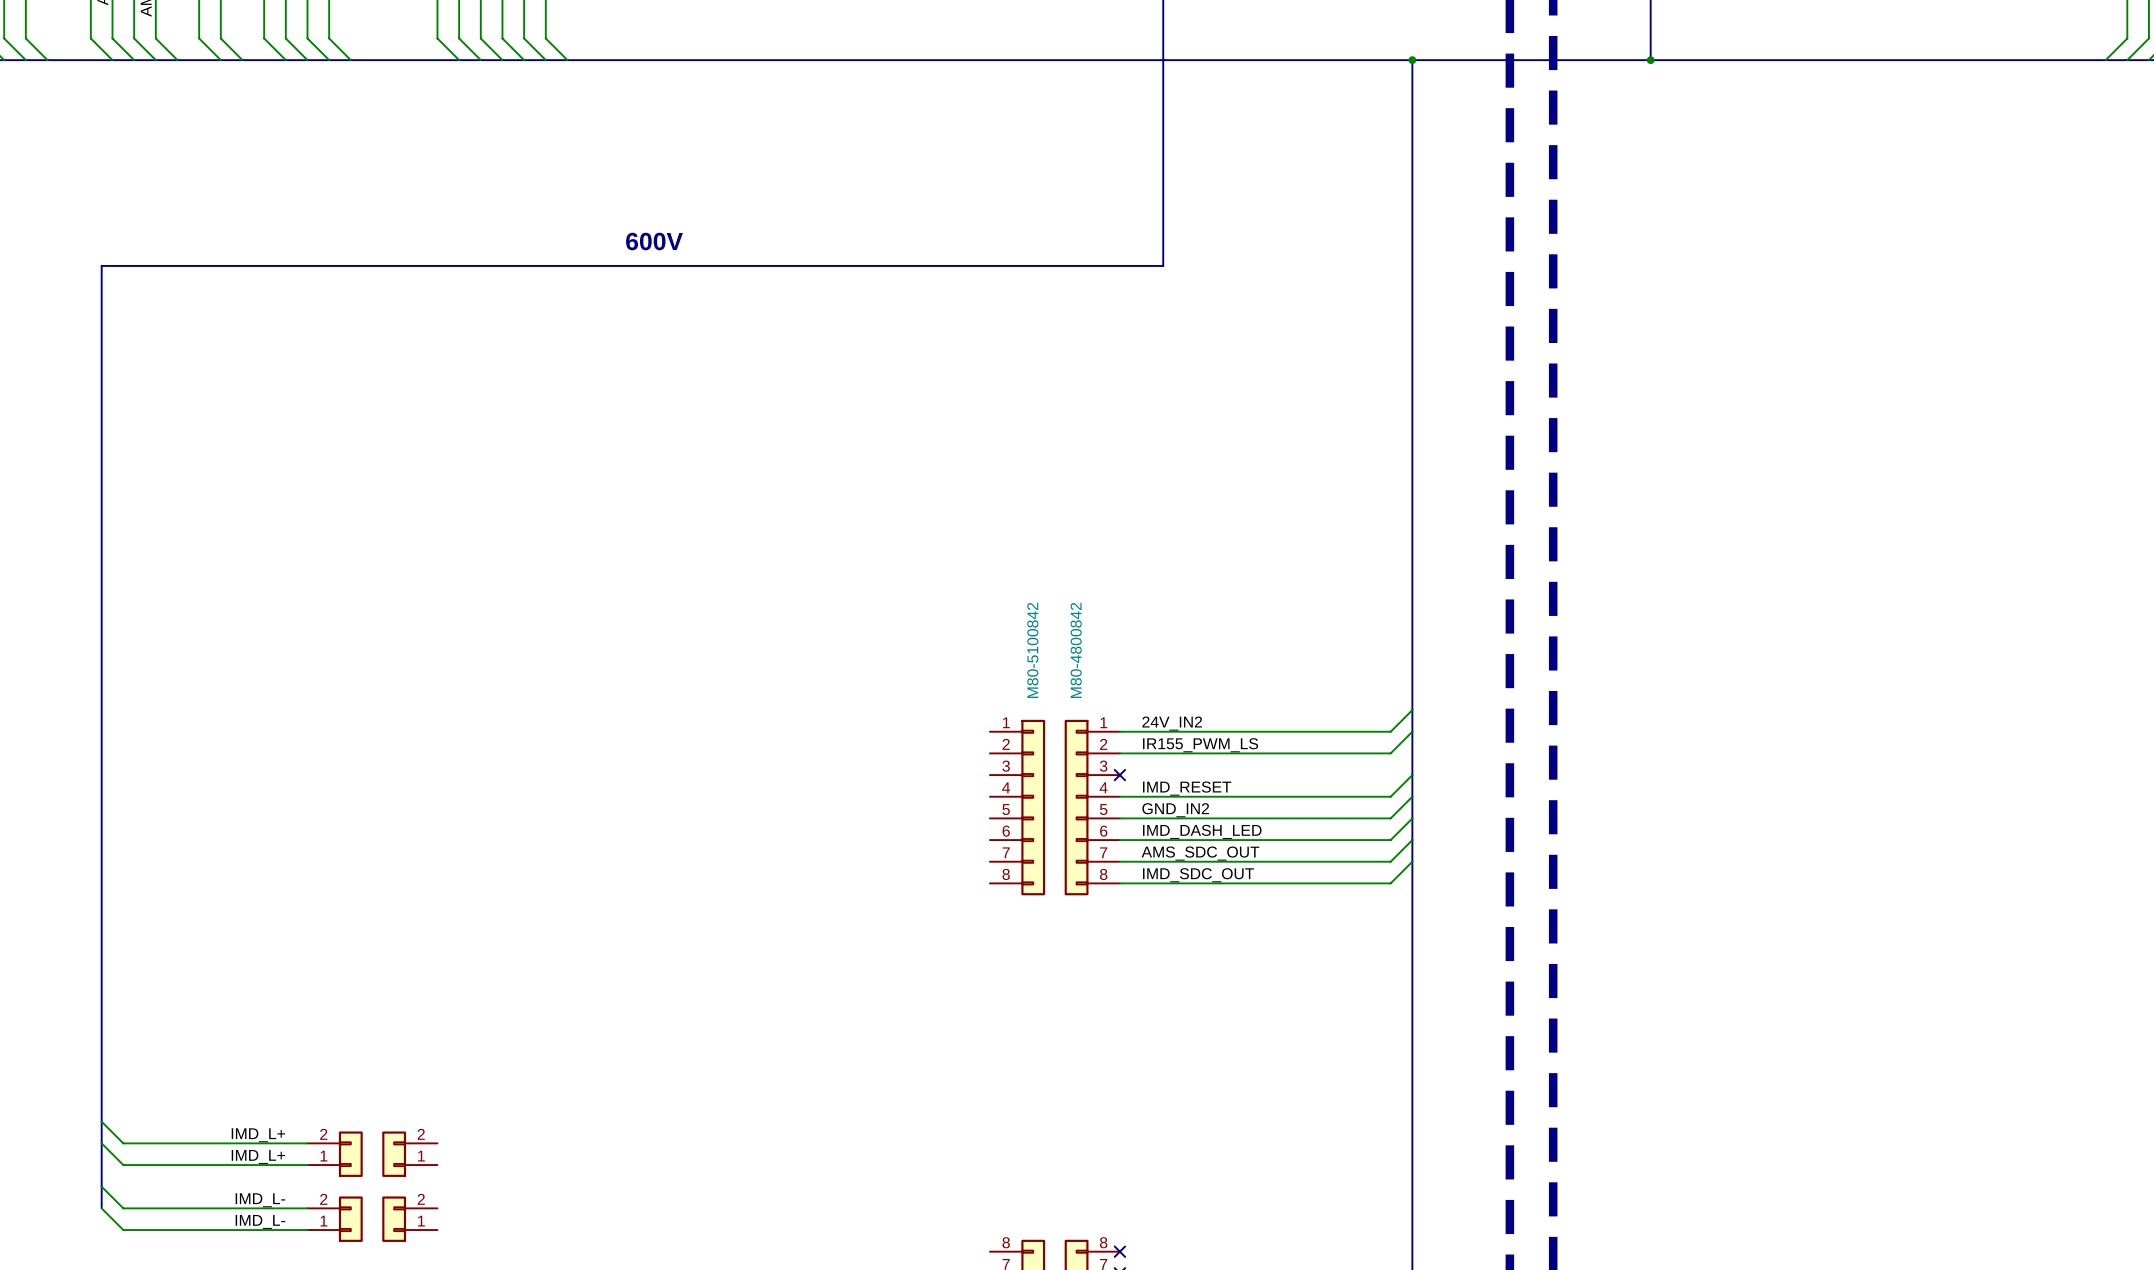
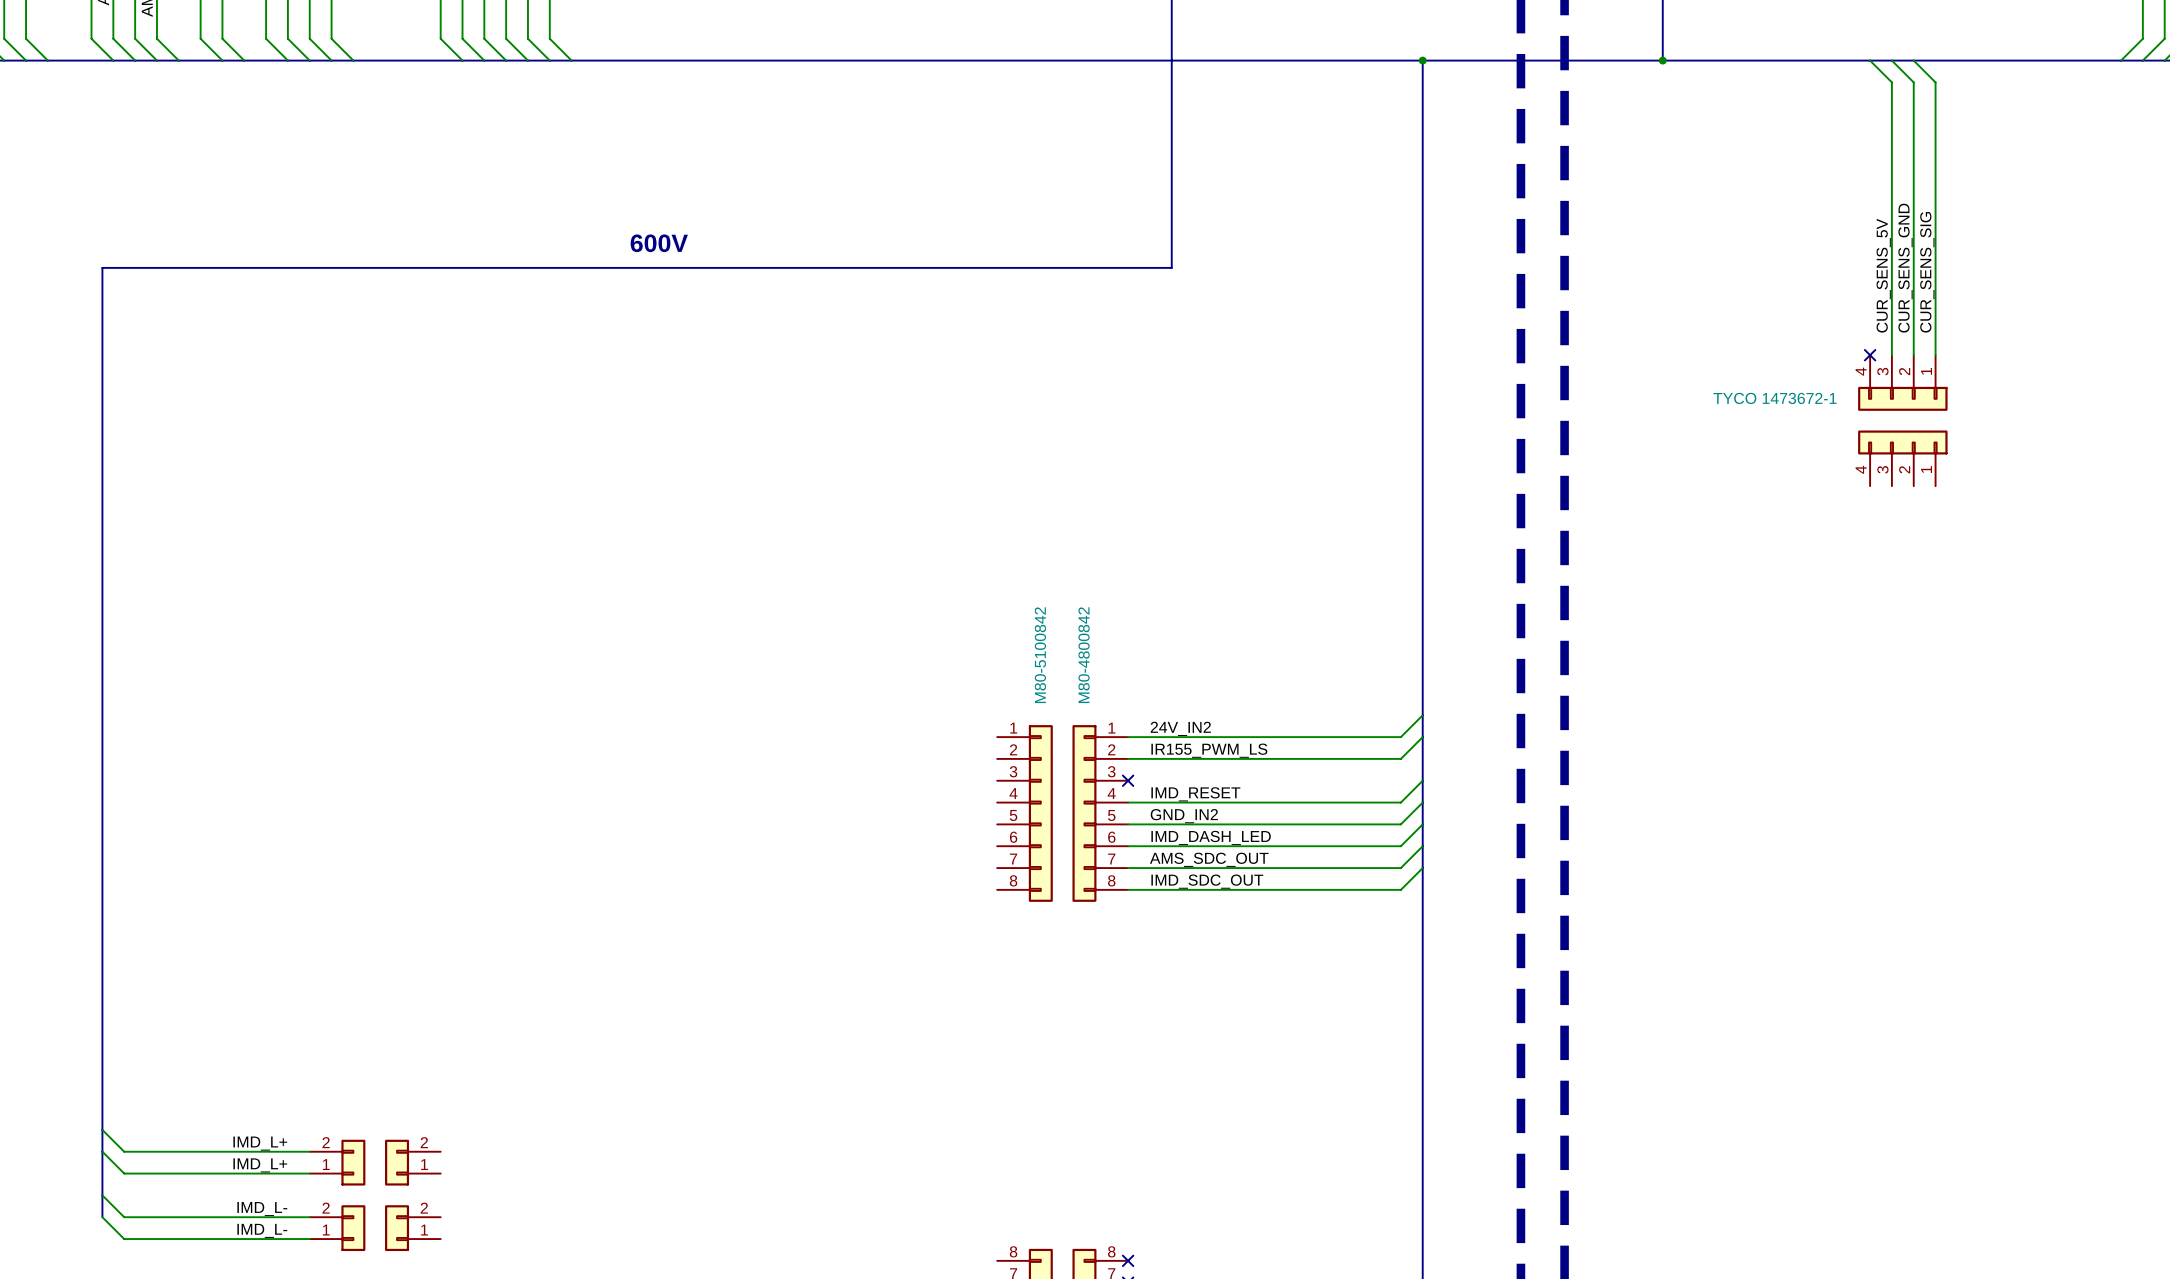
wire: none -> (1870, 60) (1891, 82) (1891, 355)
wire: none -> (1891, 60) (1913, 82) (1913, 355)
wire: none -> (1913, 60) (1935, 82) (1935, 355)
label: none -> CUR_SENS_GND (1905, 268)
label: none -> CUR_SENS_SIG (1927, 272)
label: none -> CUR_SENS_5V (1883, 275)
no-connect mark: none -> (1870, 355)
part: none -> TYCO 1473672-1 (1902, 383)
part: none -> (1902, 458)

